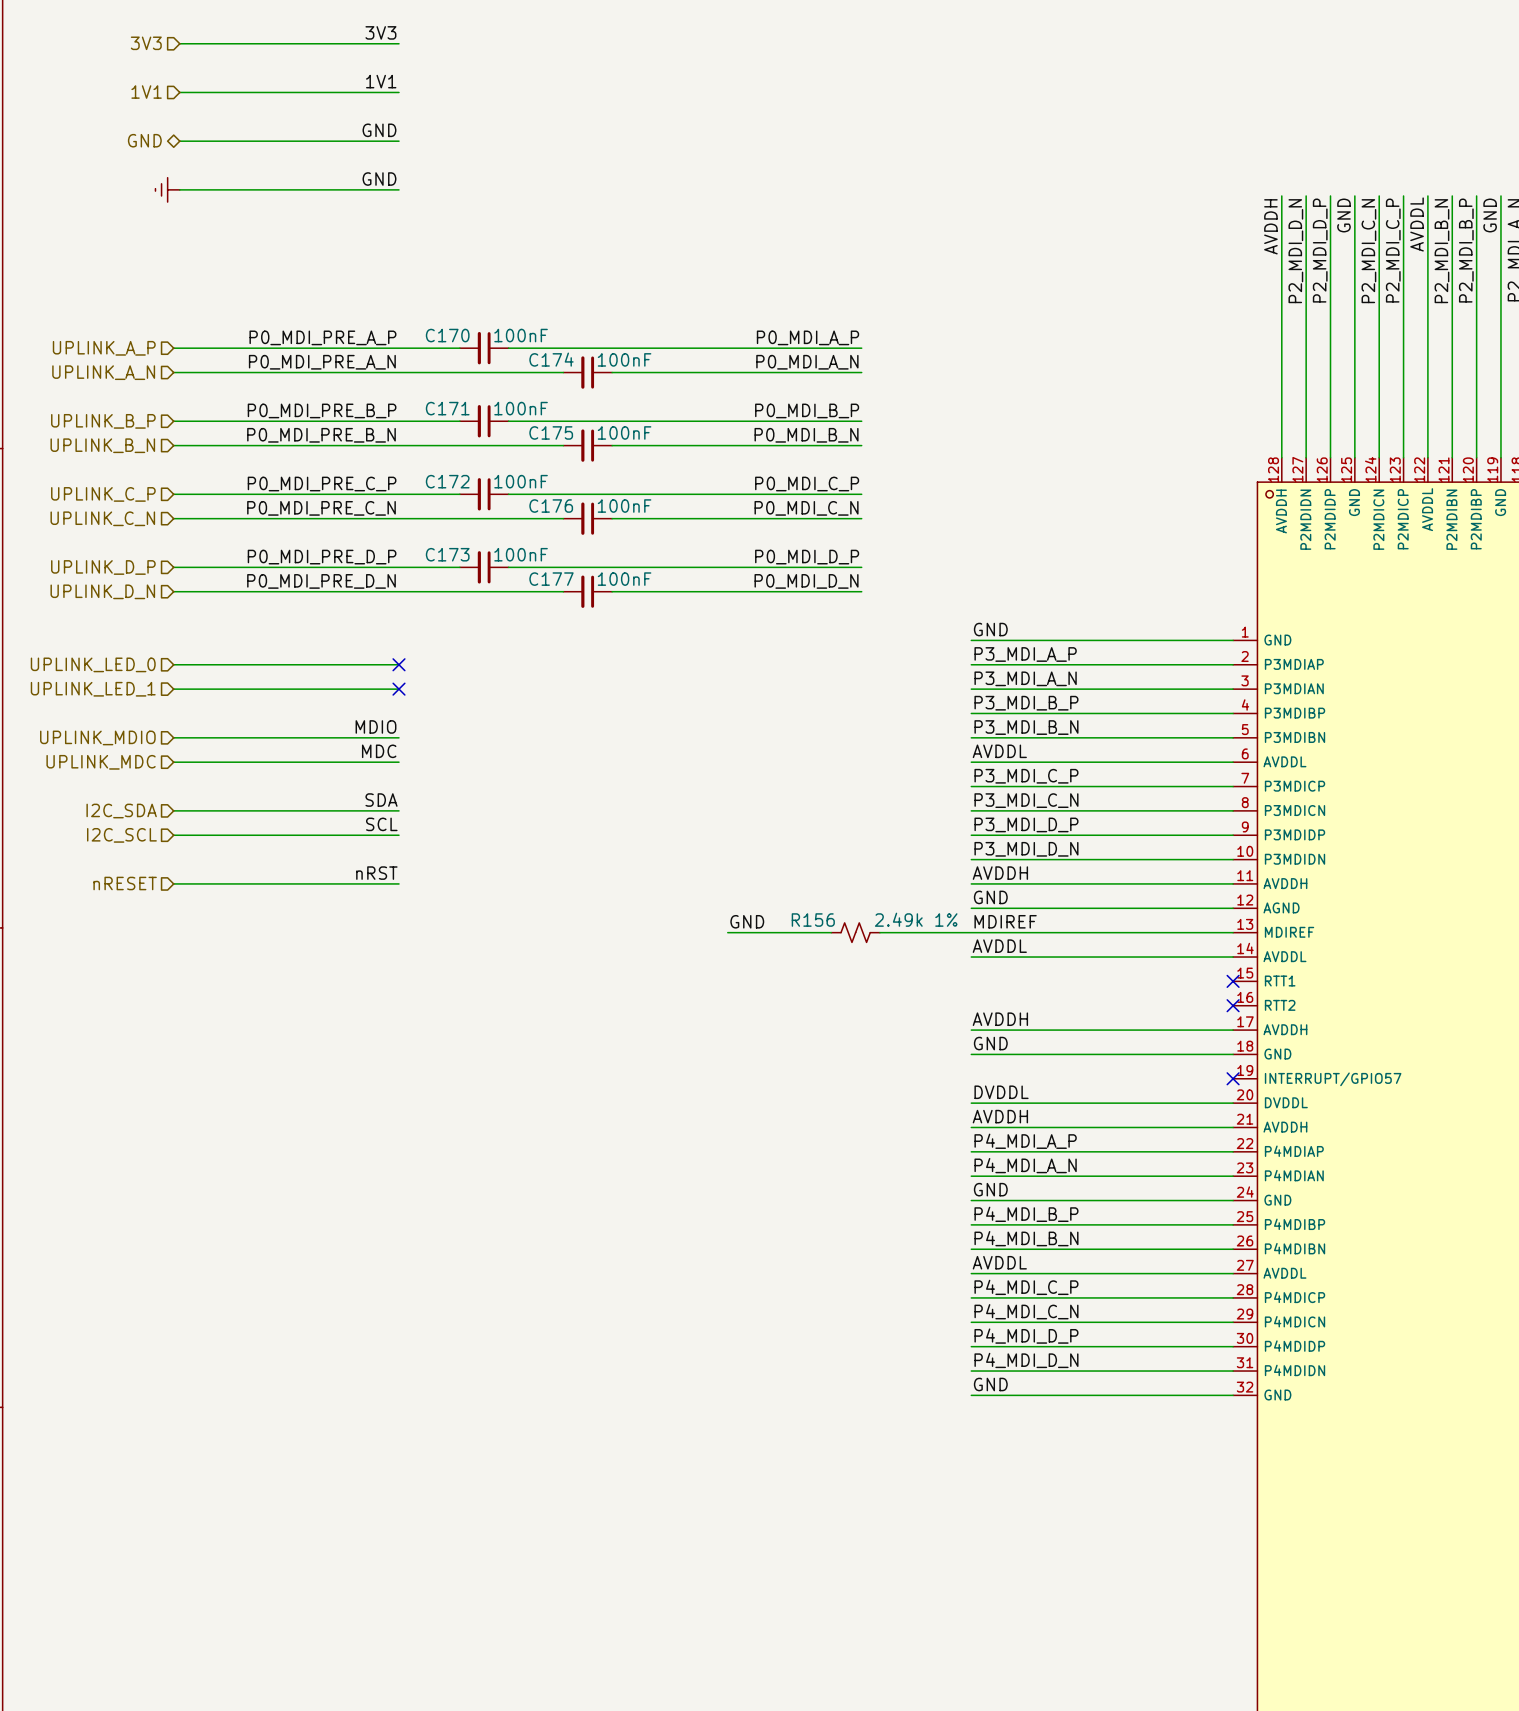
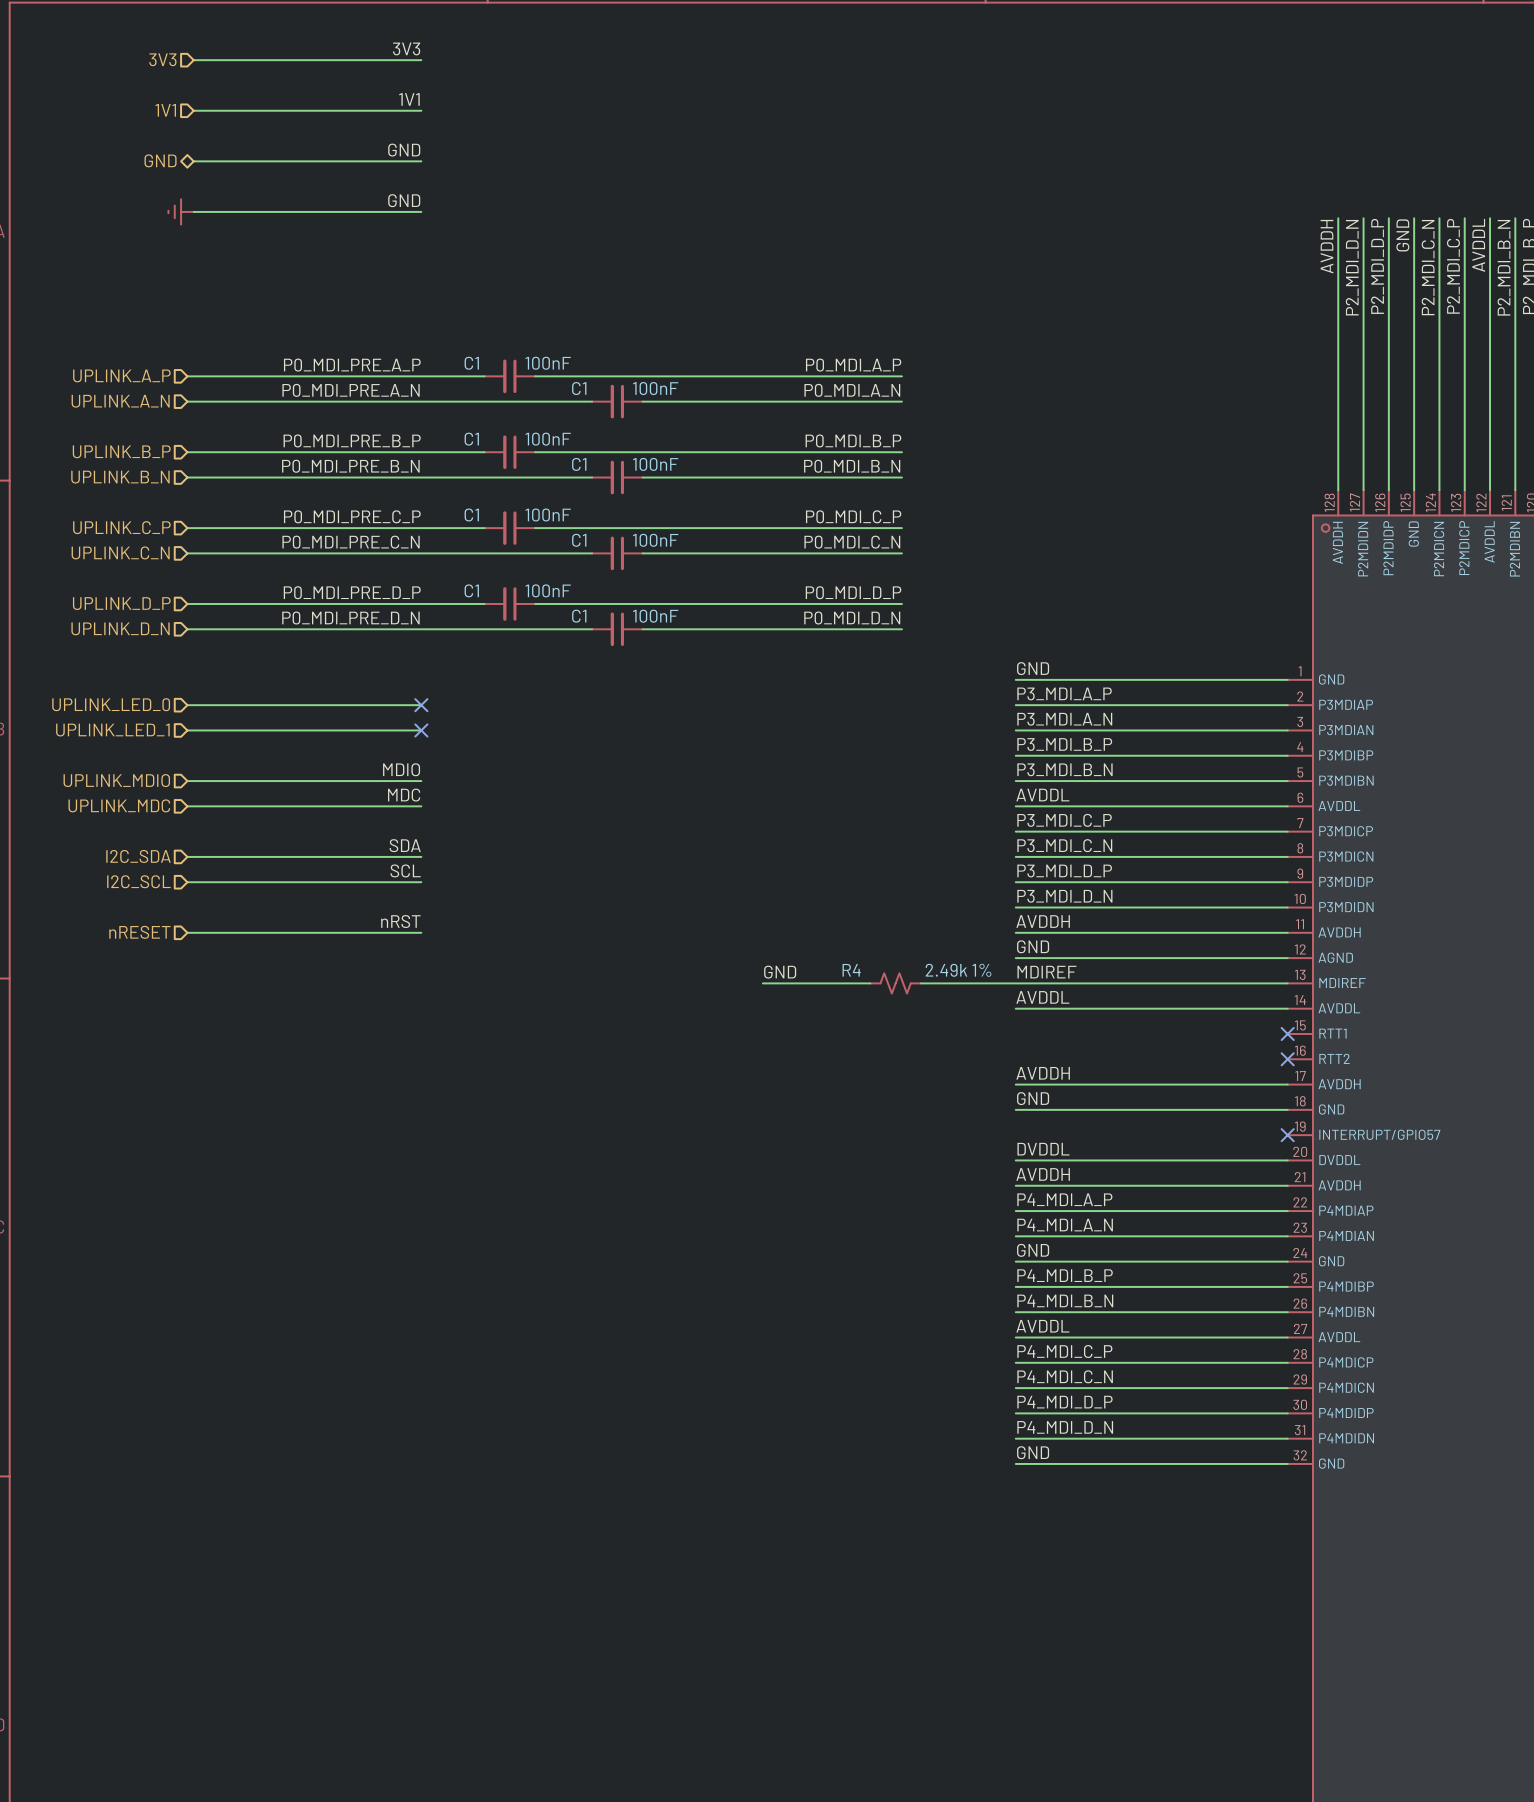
C170 name: C170 (447, 335) -> C1 (471, 363)
C174 name: C174 (551, 359) -> C1 (579, 388)
C171 name: C171 (447, 408) -> C1 (471, 439)
C175 name: C175 (551, 432) -> C1 (579, 464)
C172 name: C172 (447, 481) -> C1 (471, 515)
C176 name: C176 (551, 506) -> C1 (579, 540)
C173 name: C173 (447, 554) -> C1 (471, 590)
C177 name: C177 (551, 579) -> C1 (579, 616)
R156 name: R156 (813, 920) -> R4 (851, 970)

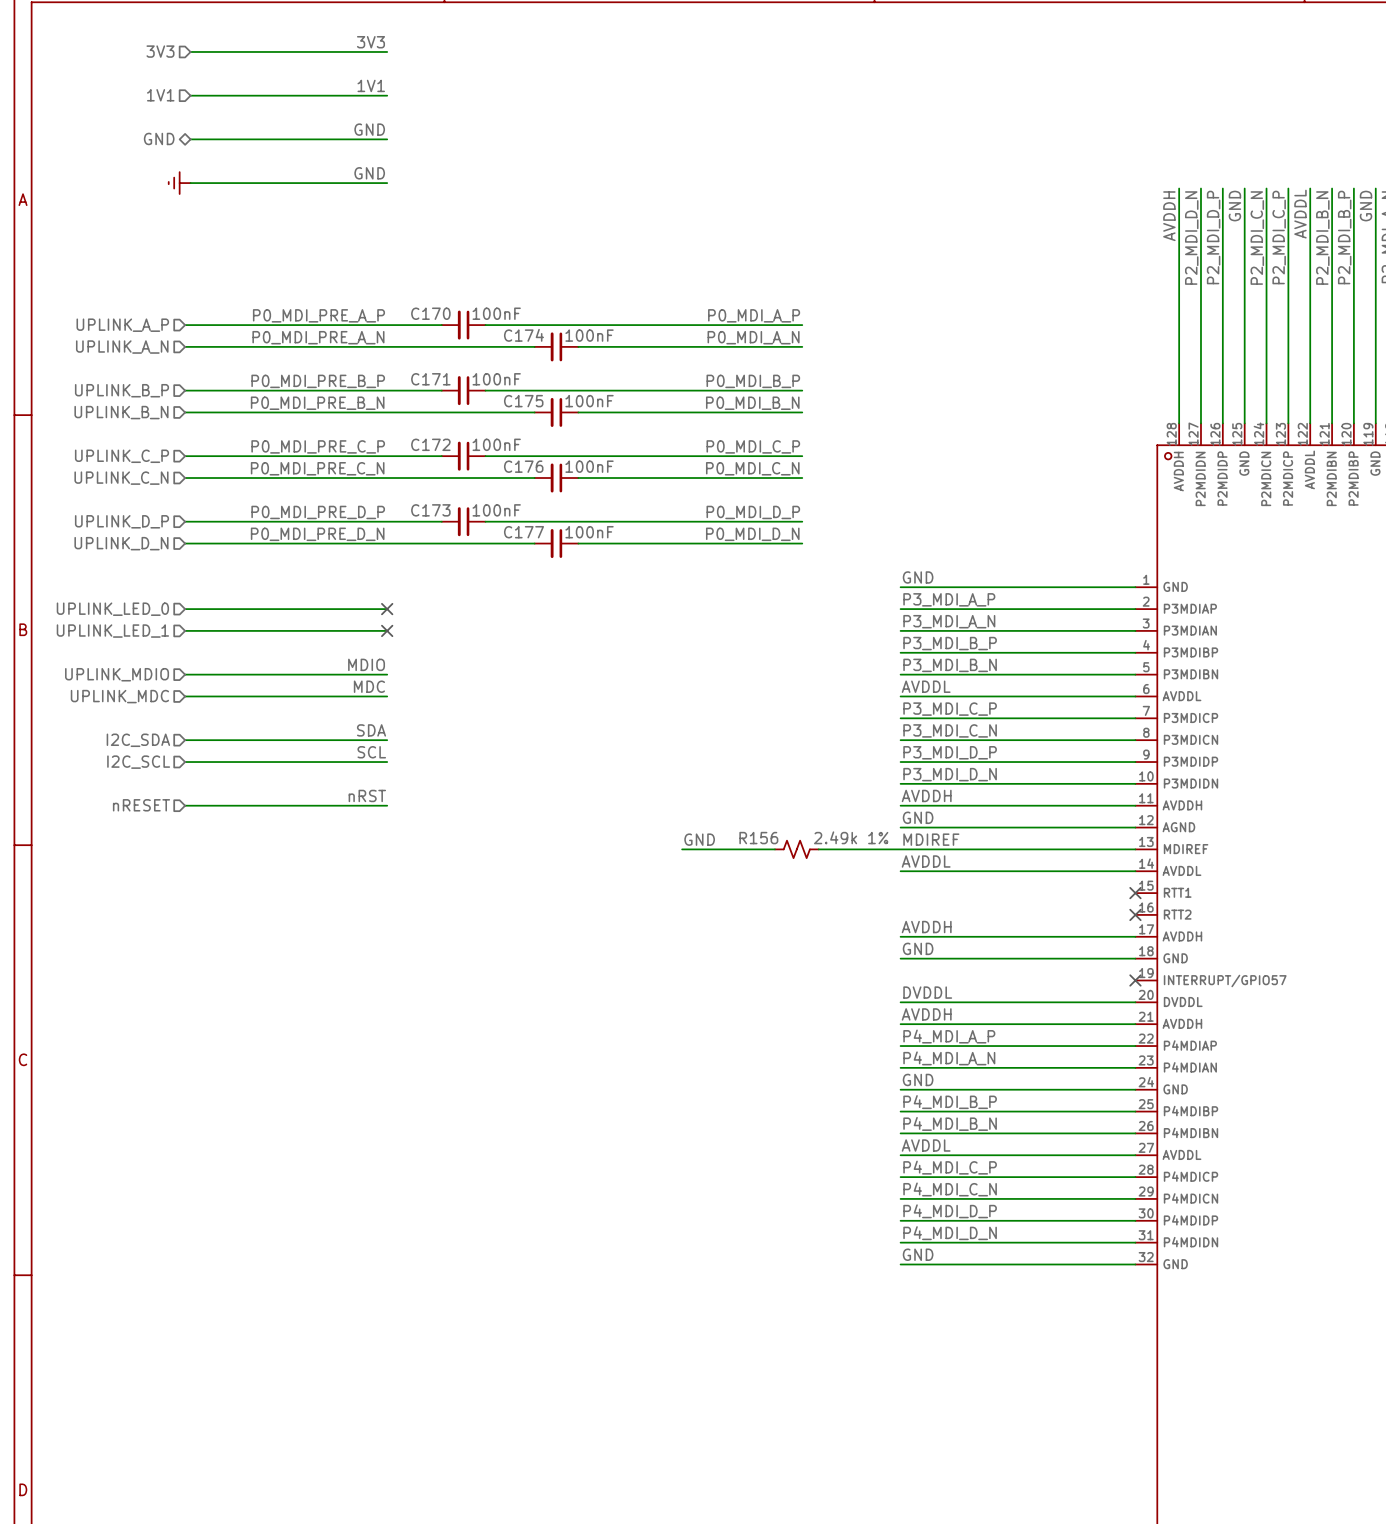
C1 name: C1 (471, 363) -> C170 (430, 313)
C1 name: C1 (579, 388) -> C174 (523, 335)
C1 name: C1 (471, 439) -> C171 (430, 379)
C1 name: C1 (579, 464) -> C175 (523, 401)
C1 name: C1 (471, 515) -> C172 (430, 444)
C1 name: C1 (579, 540) -> C176 (523, 466)
C1 name: C1 (471, 590) -> C173 (430, 510)
C1 name: C1 (579, 616) -> C177 (523, 532)
R4 name: R4 (851, 970) -> R156 (758, 838)

